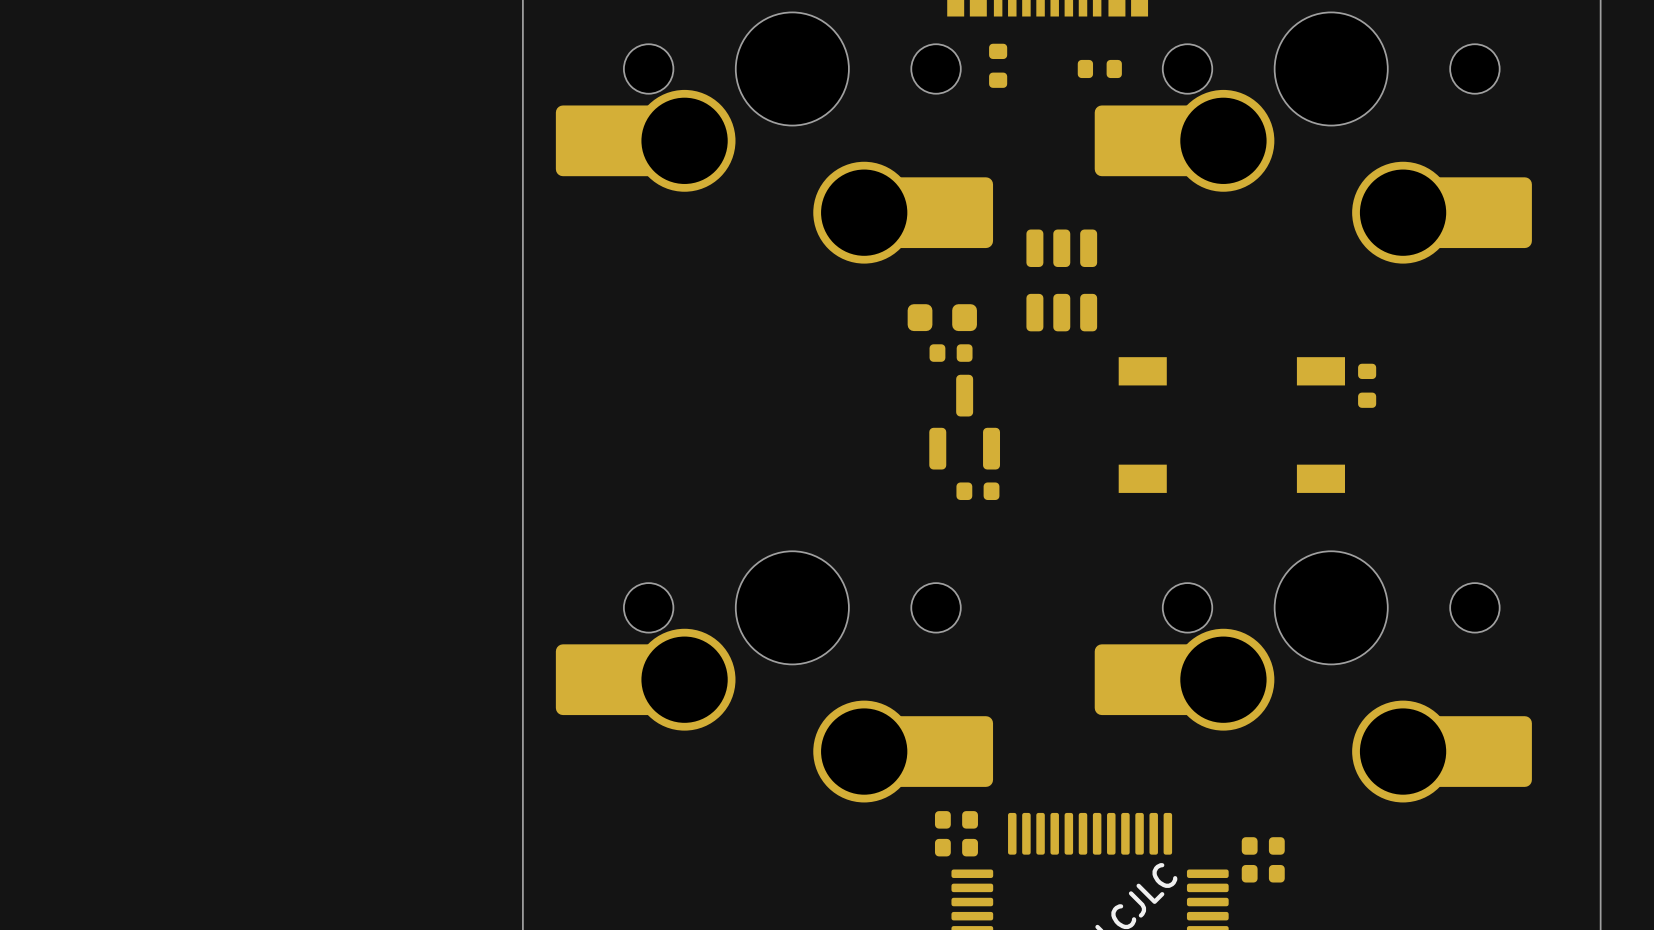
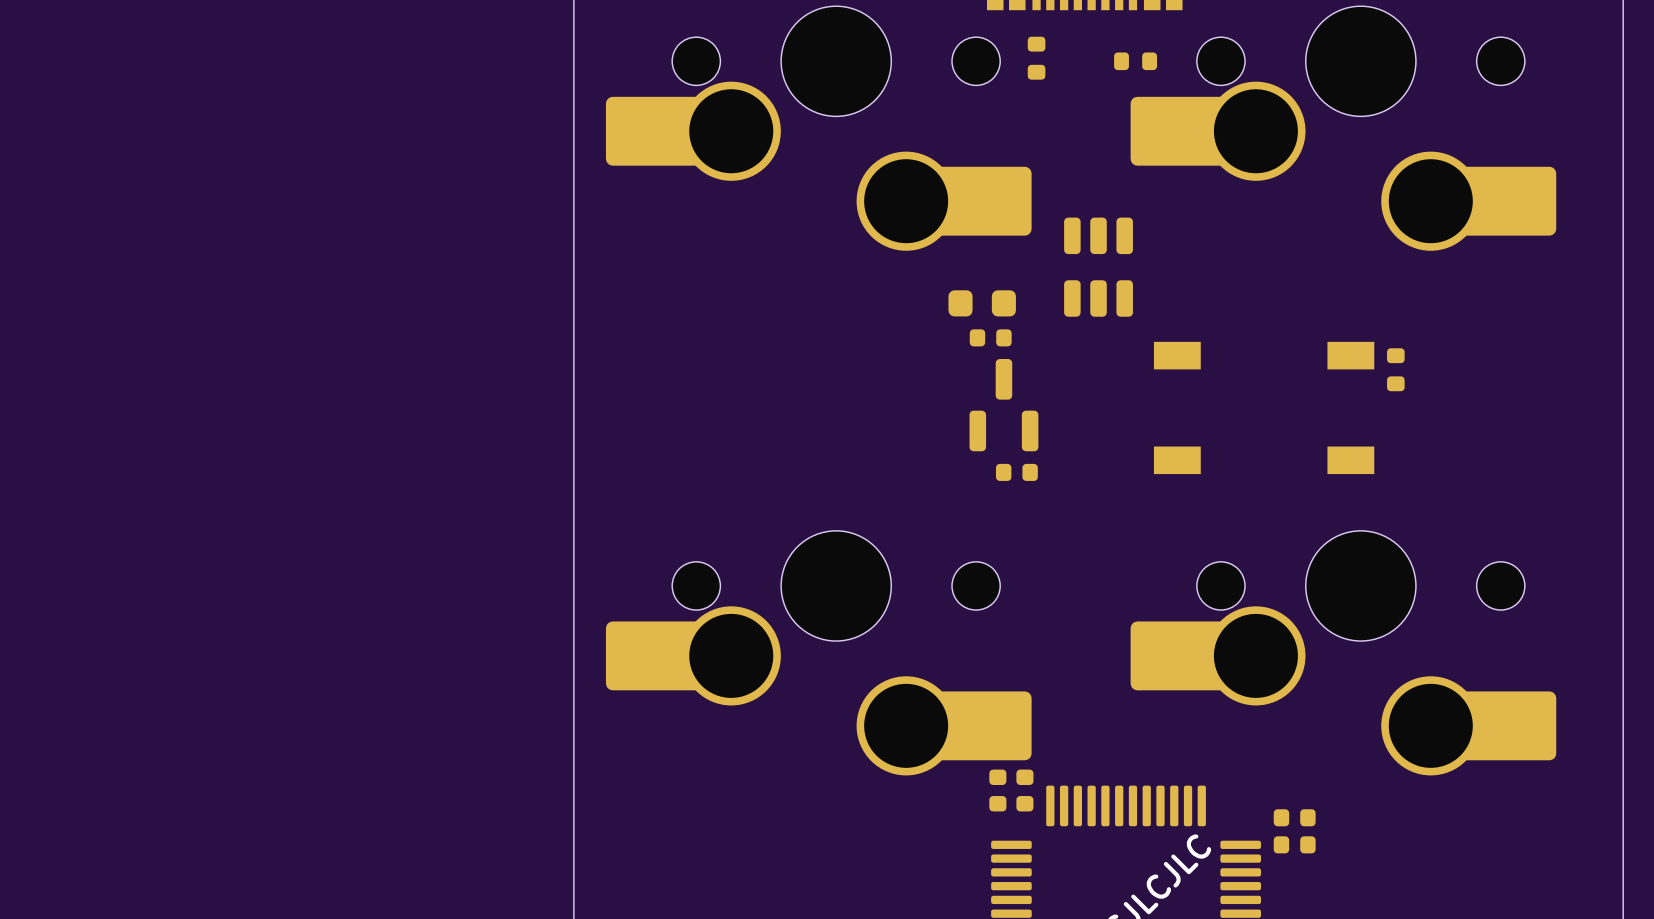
part rotation: 0° (956, 819) -> 90° clockwise (997, 790)
part rotation: 0° (956, 847) -> 90° clockwise (1024, 790)
part position: (956, 847) -> (1024, 790)

